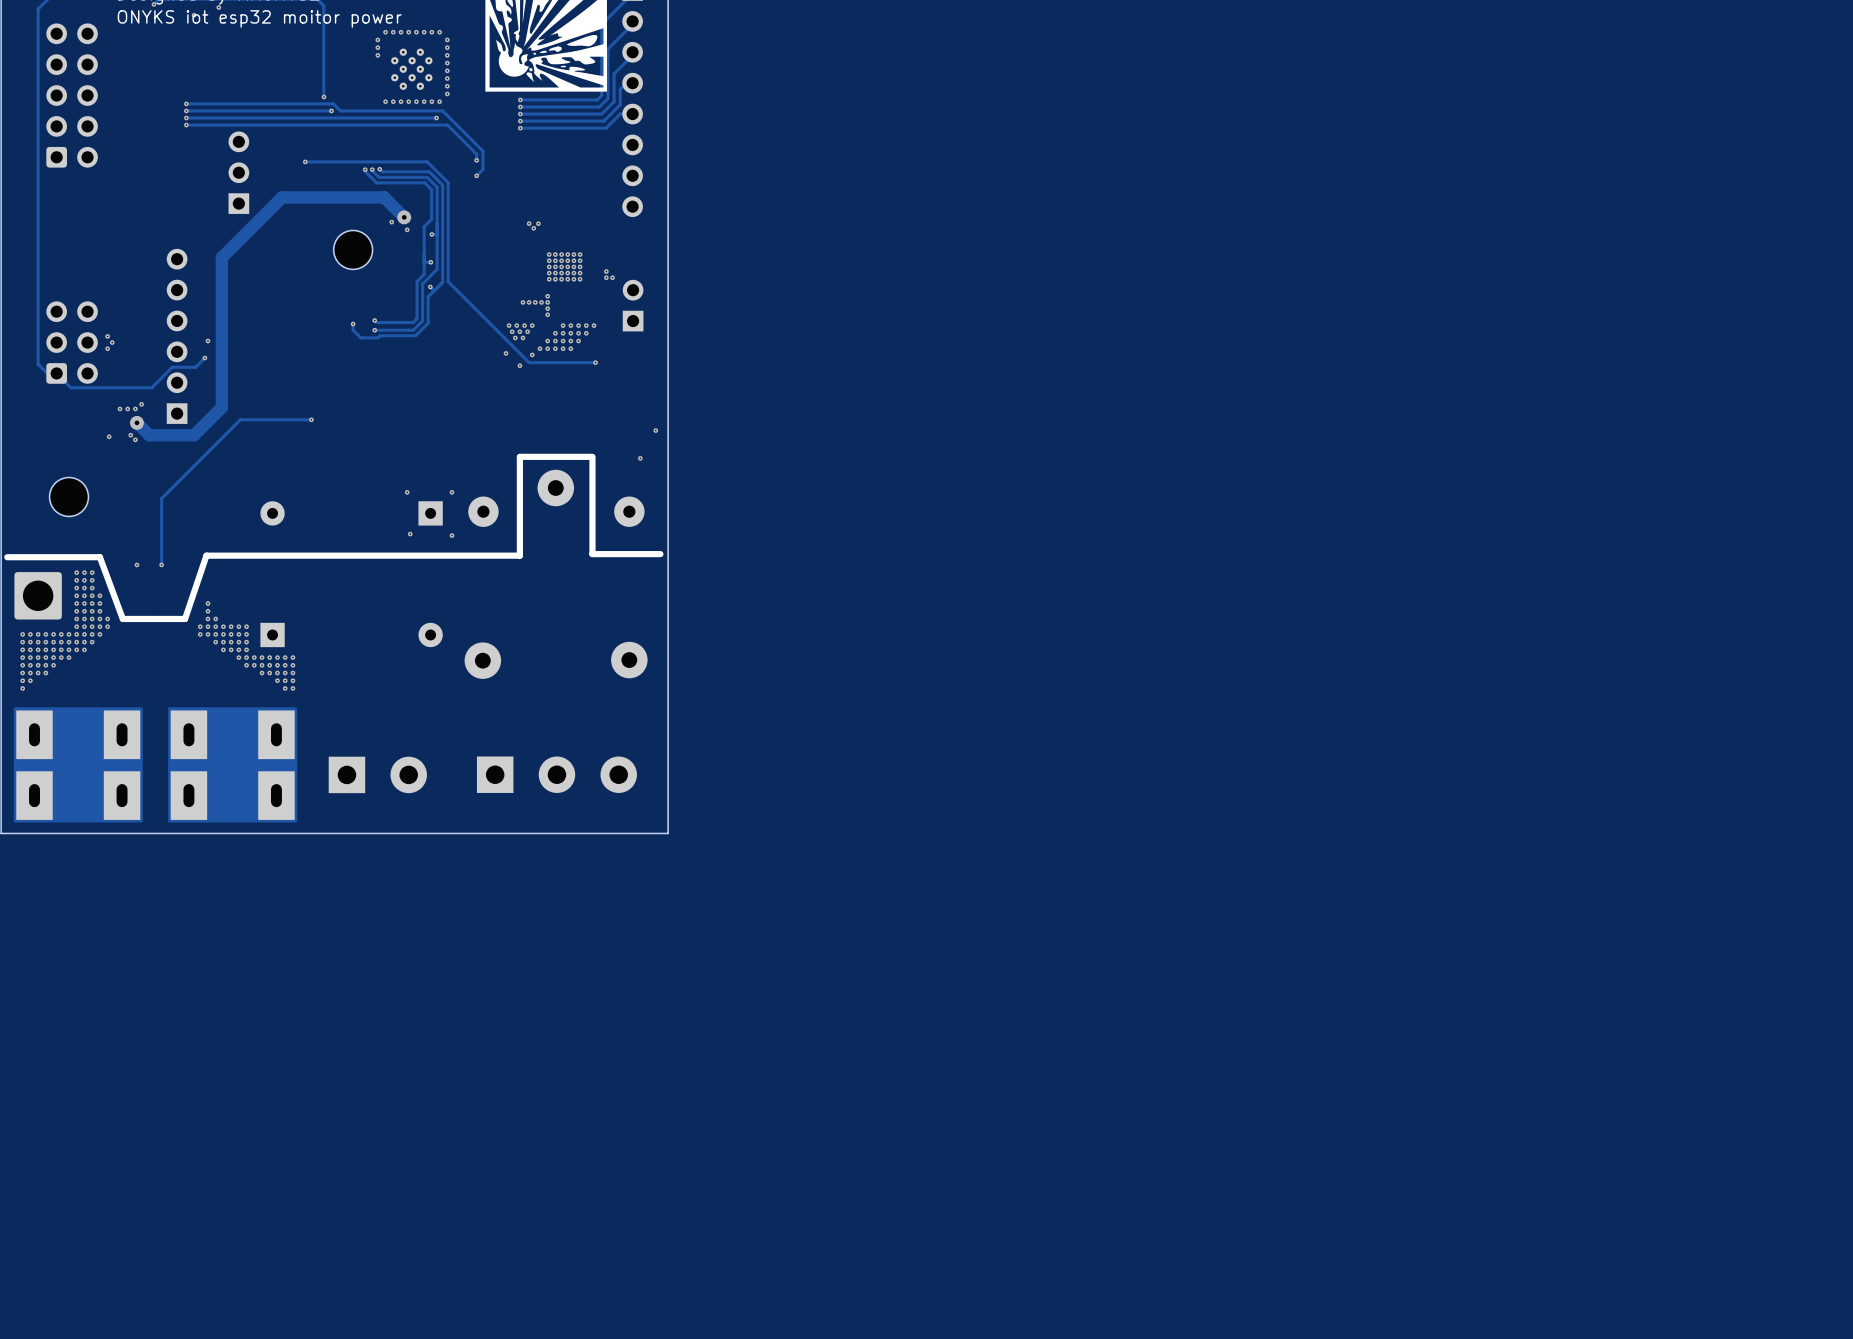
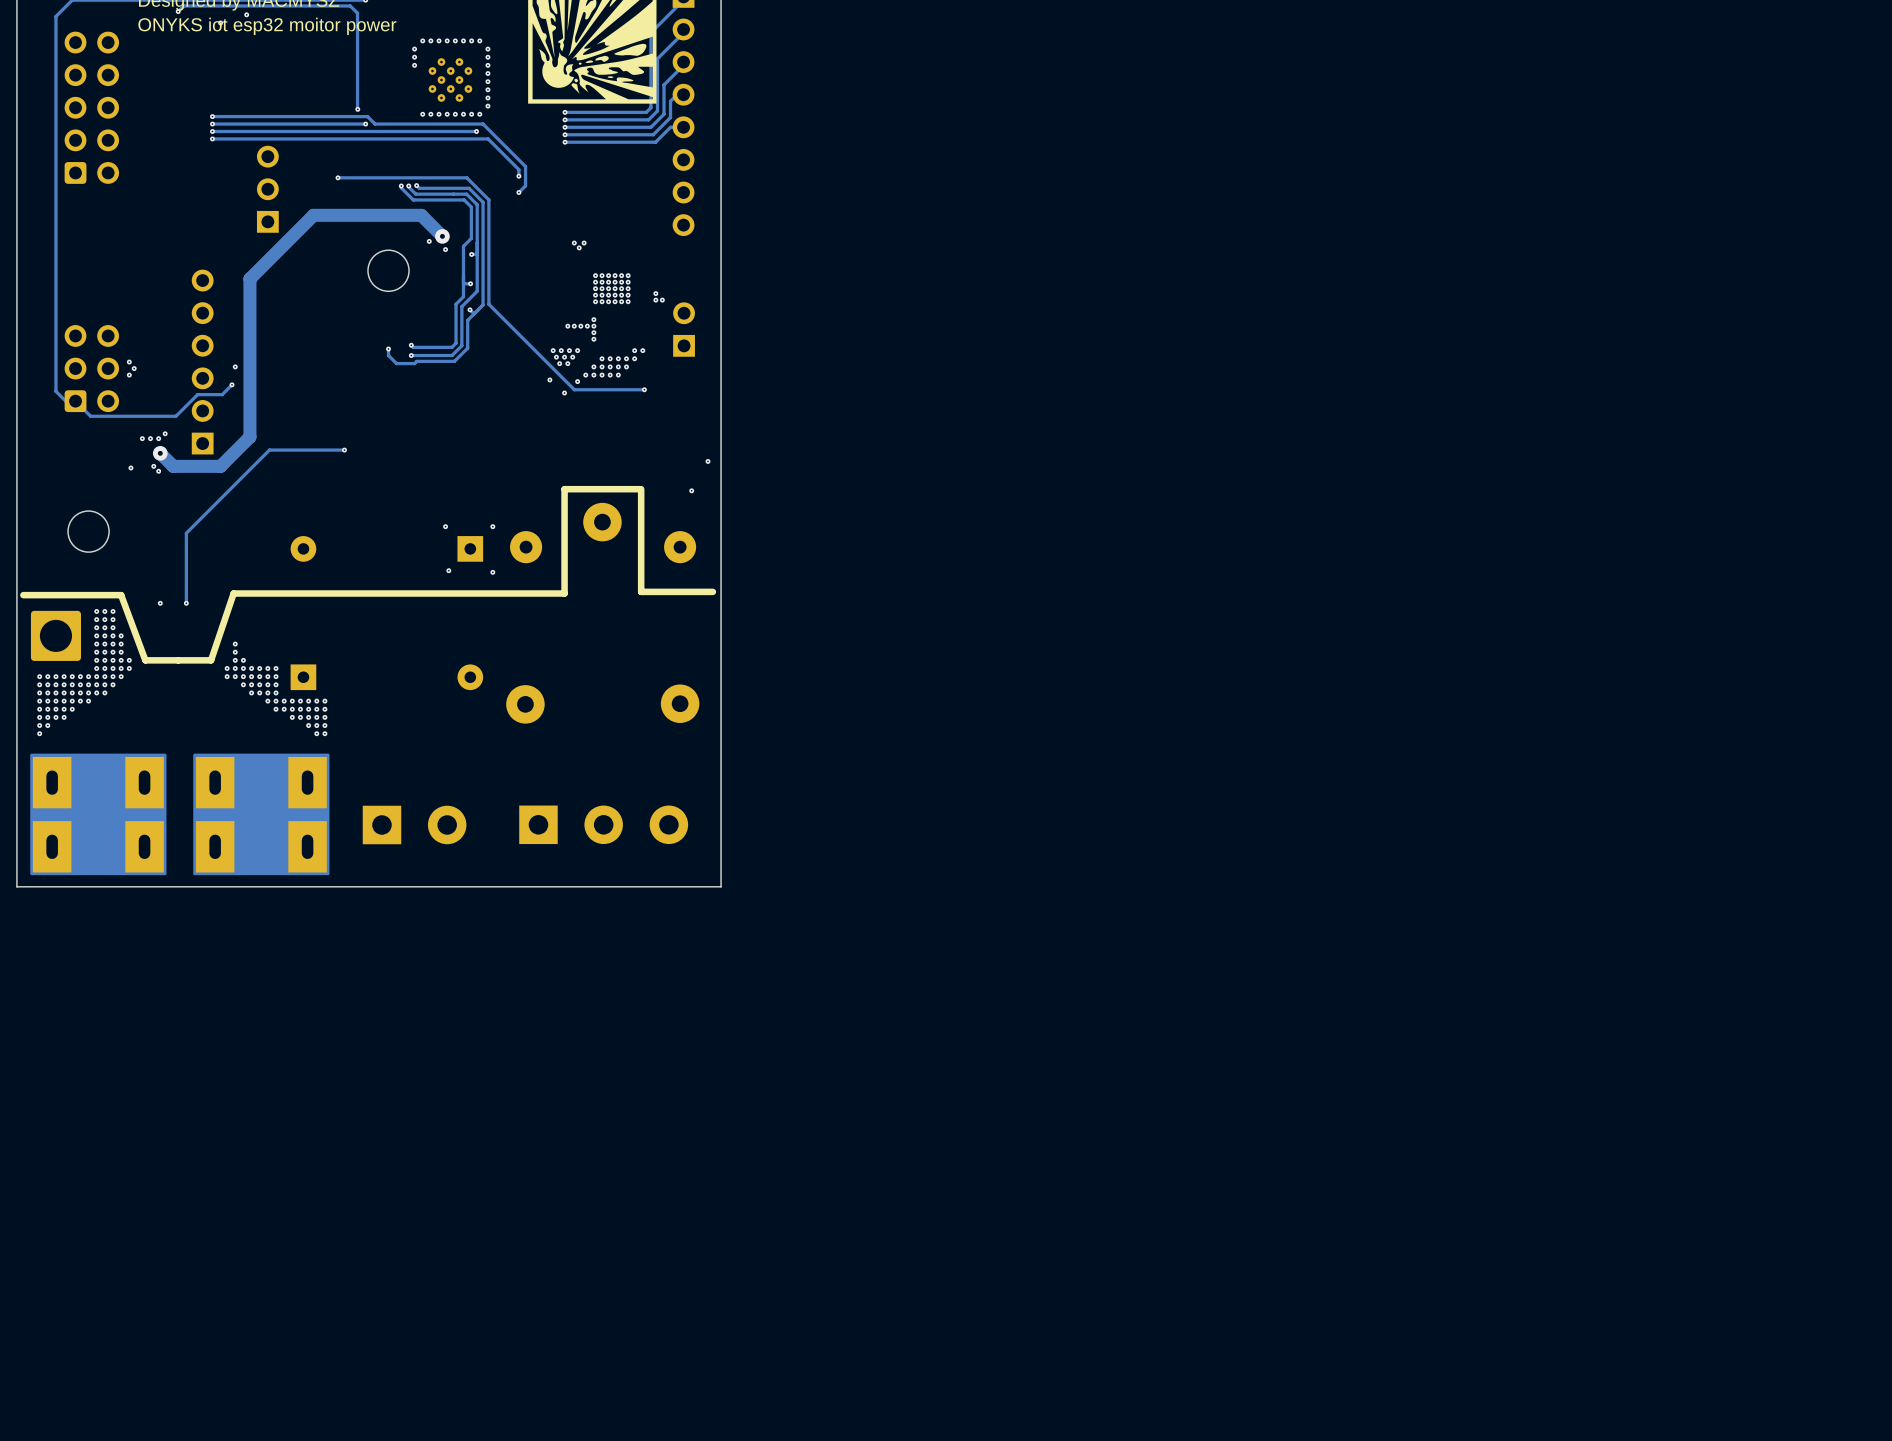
via: (563, 325) -> none
via: (570, 325) -> none
via: (578, 325) -> none

